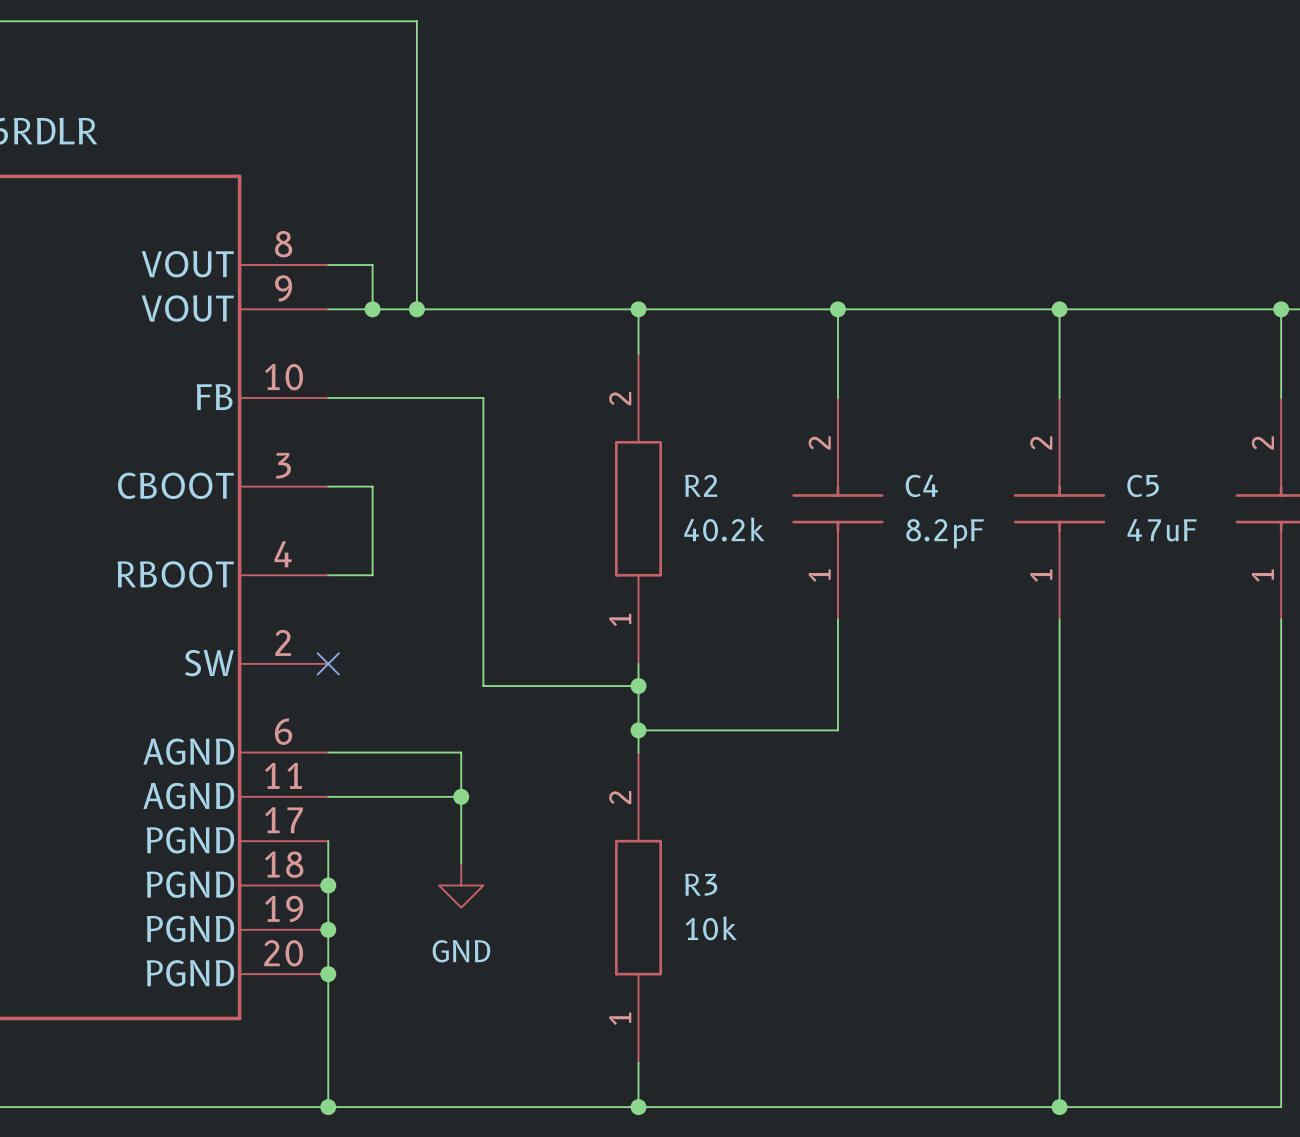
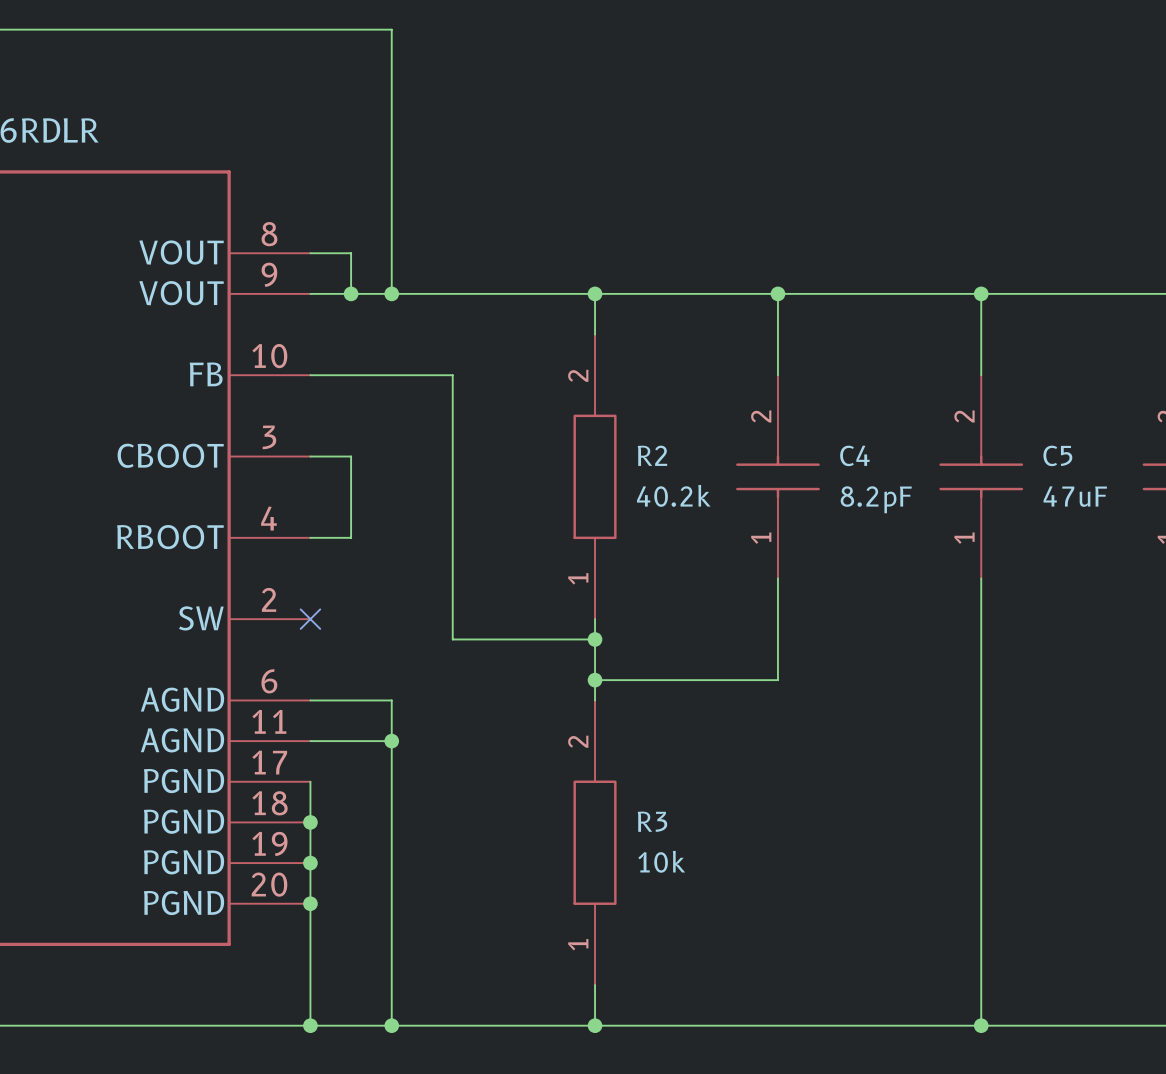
wire: (416, 752) (461, 752) (461, 863) -> (391, 700) (391, 1025)
wire: (416, 796) (461, 796) -> none
junction position: (461, 796) -> (391, 741)
power symbol: GND (461, 885) -> none
junction: none -> (391, 1025)

